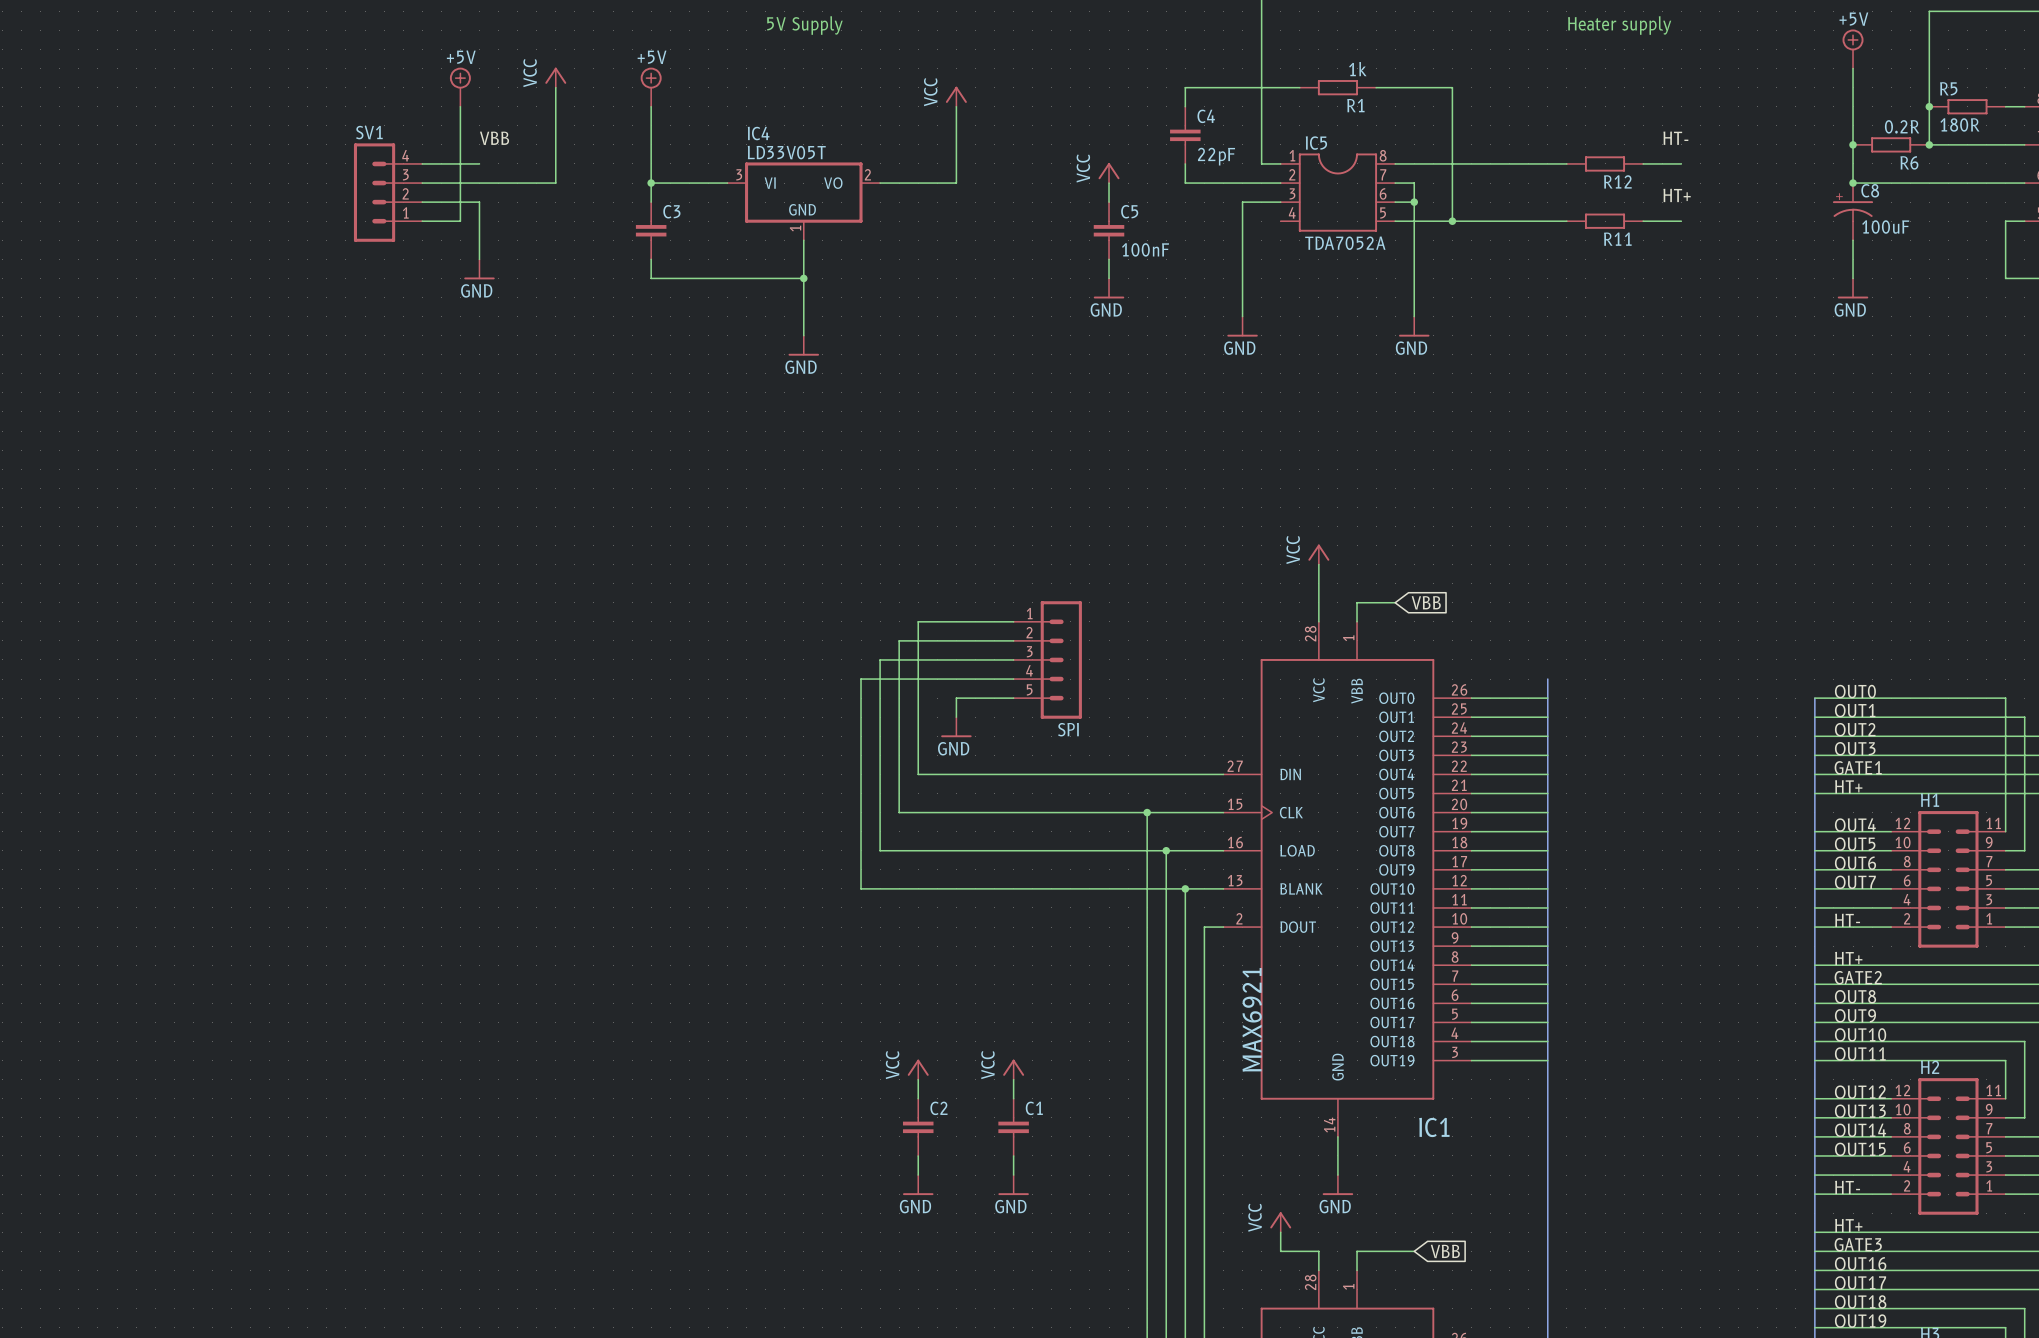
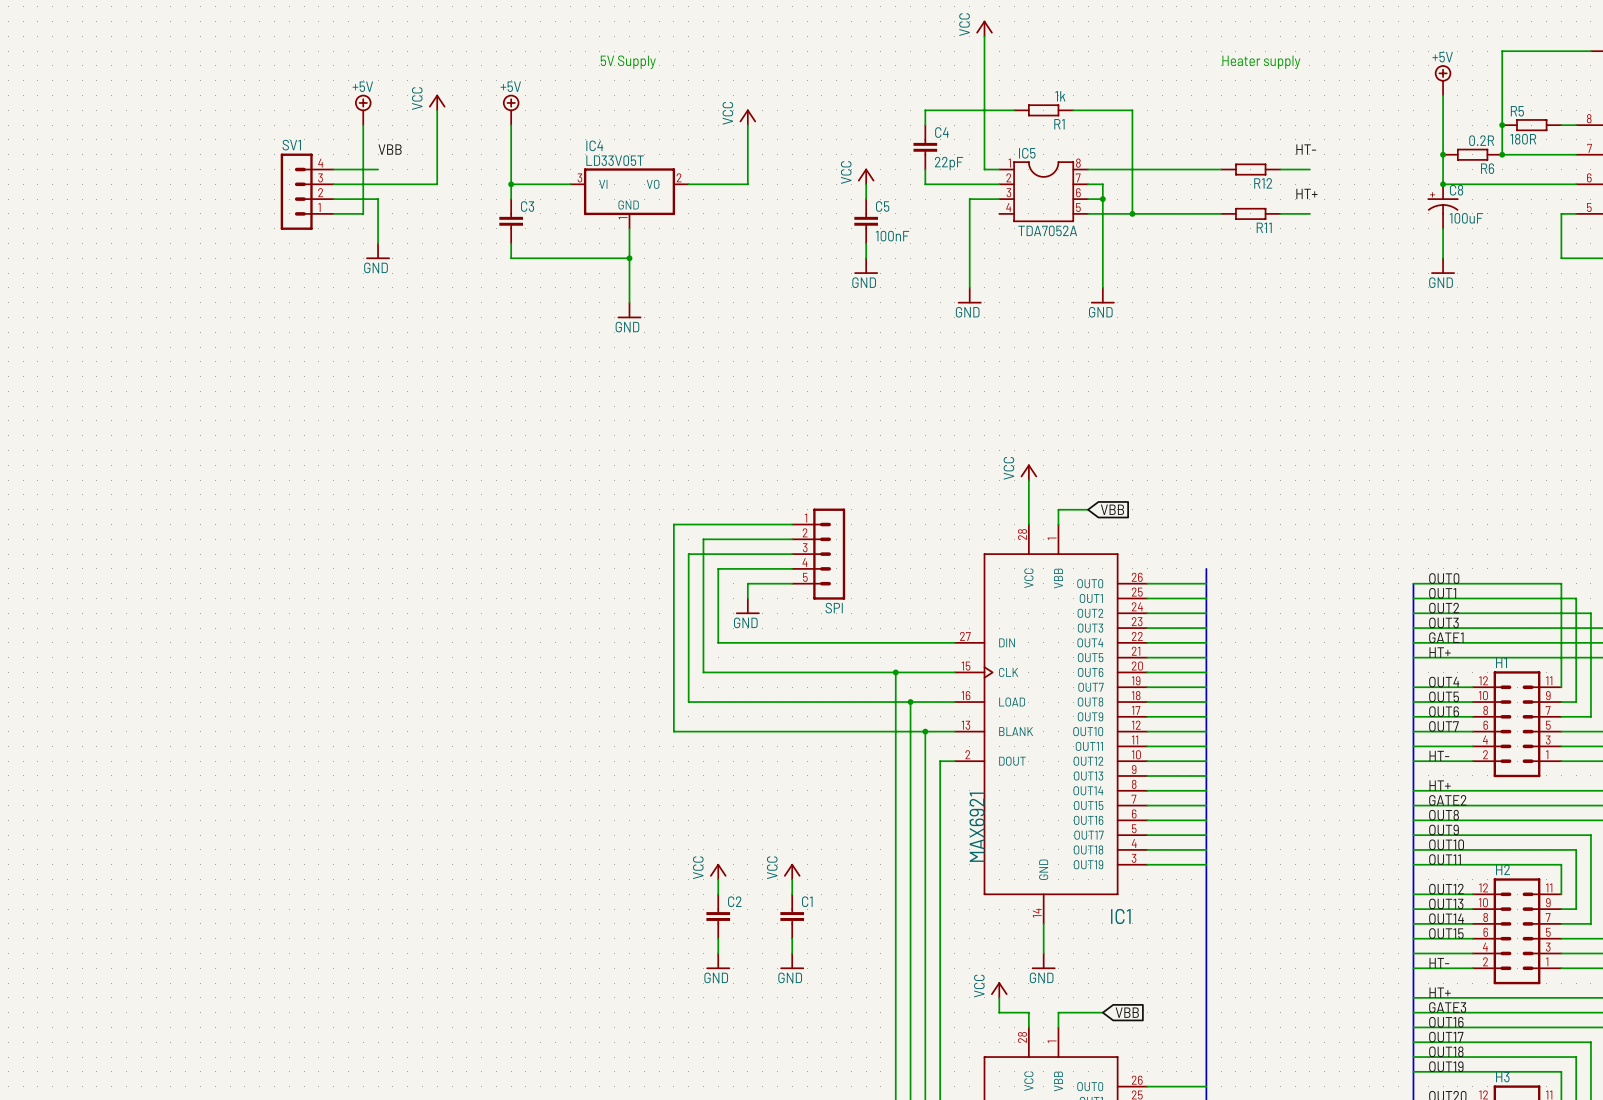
wire: (918, 621) (918, 679) (861, 679) -> (718, 524) (673, 524) (673, 568)

